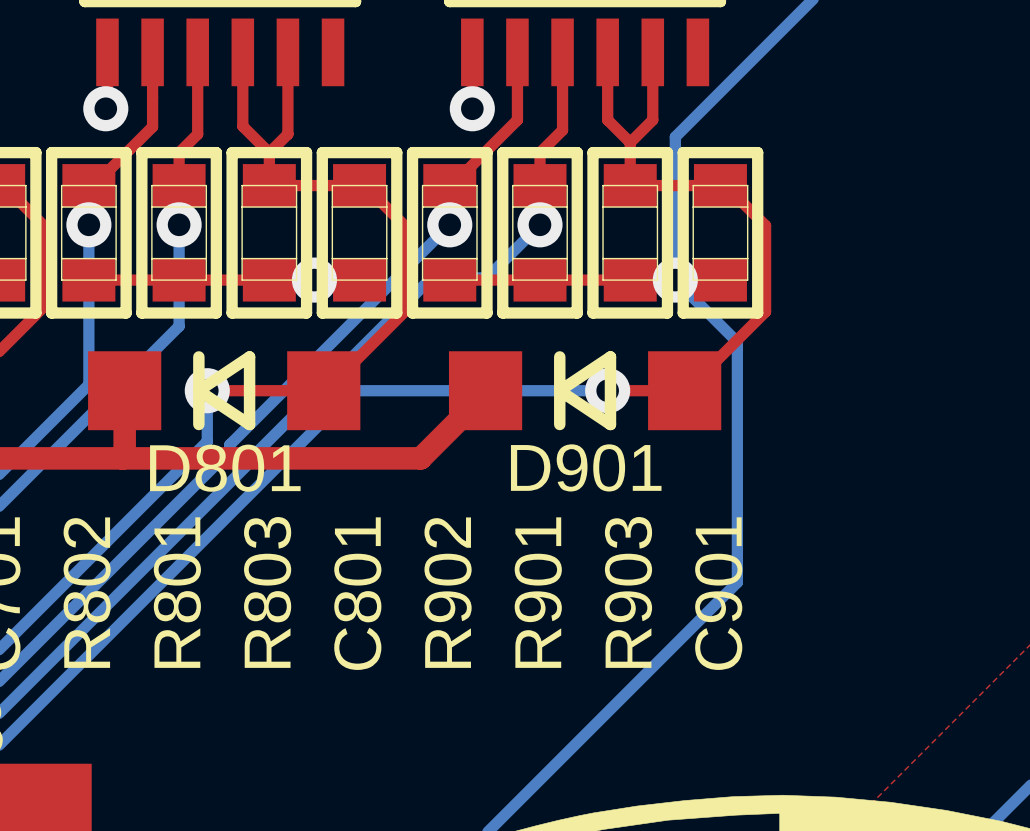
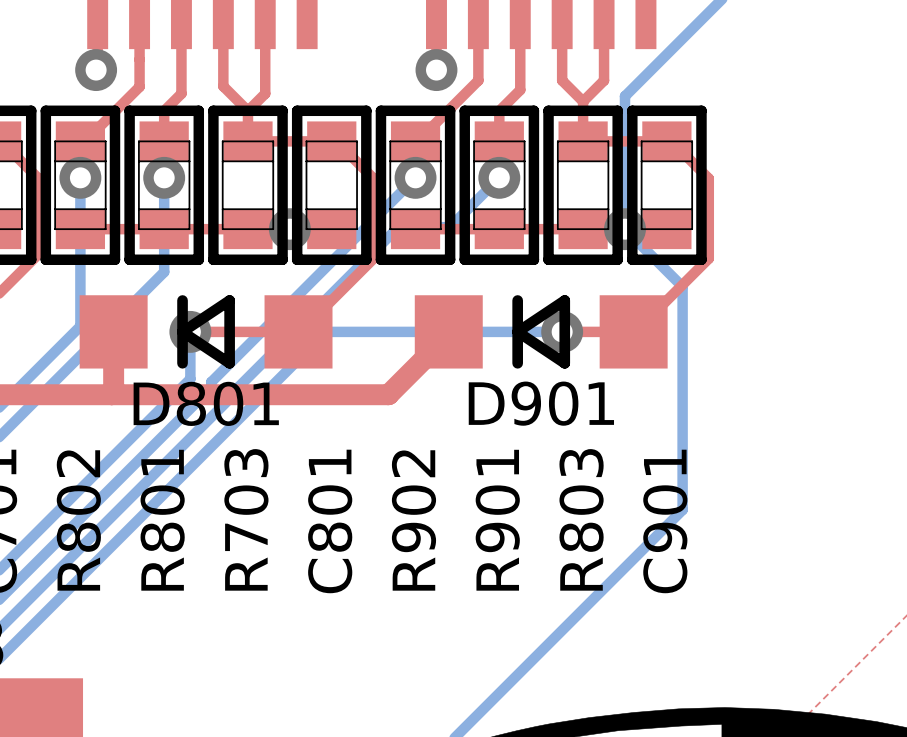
R803 name: R803 (267, 592) -> R703 (246, 519)
R903 name: R903 (628, 592) -> R803 (581, 519)

